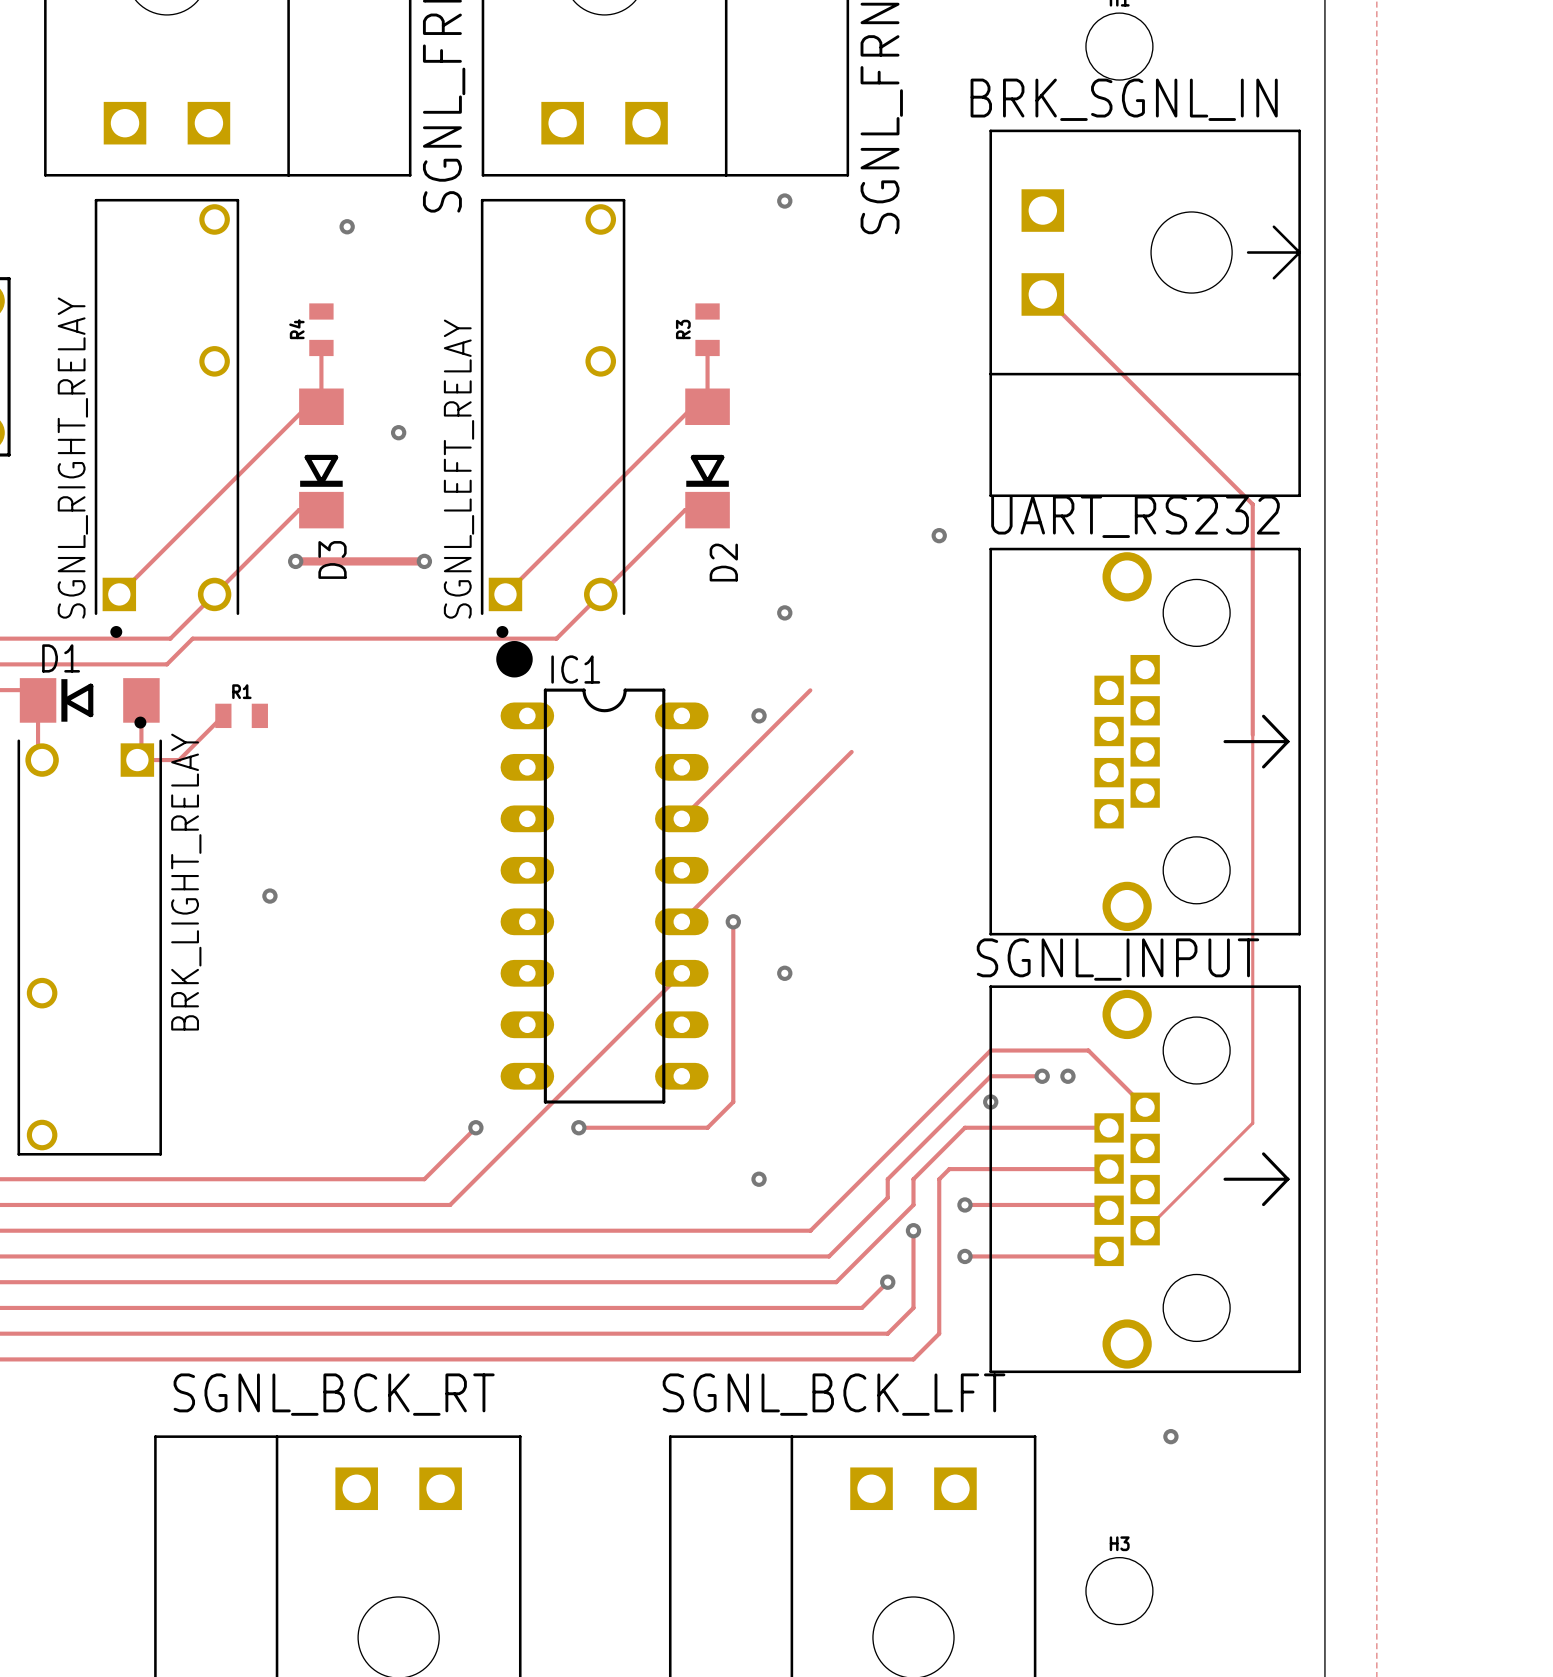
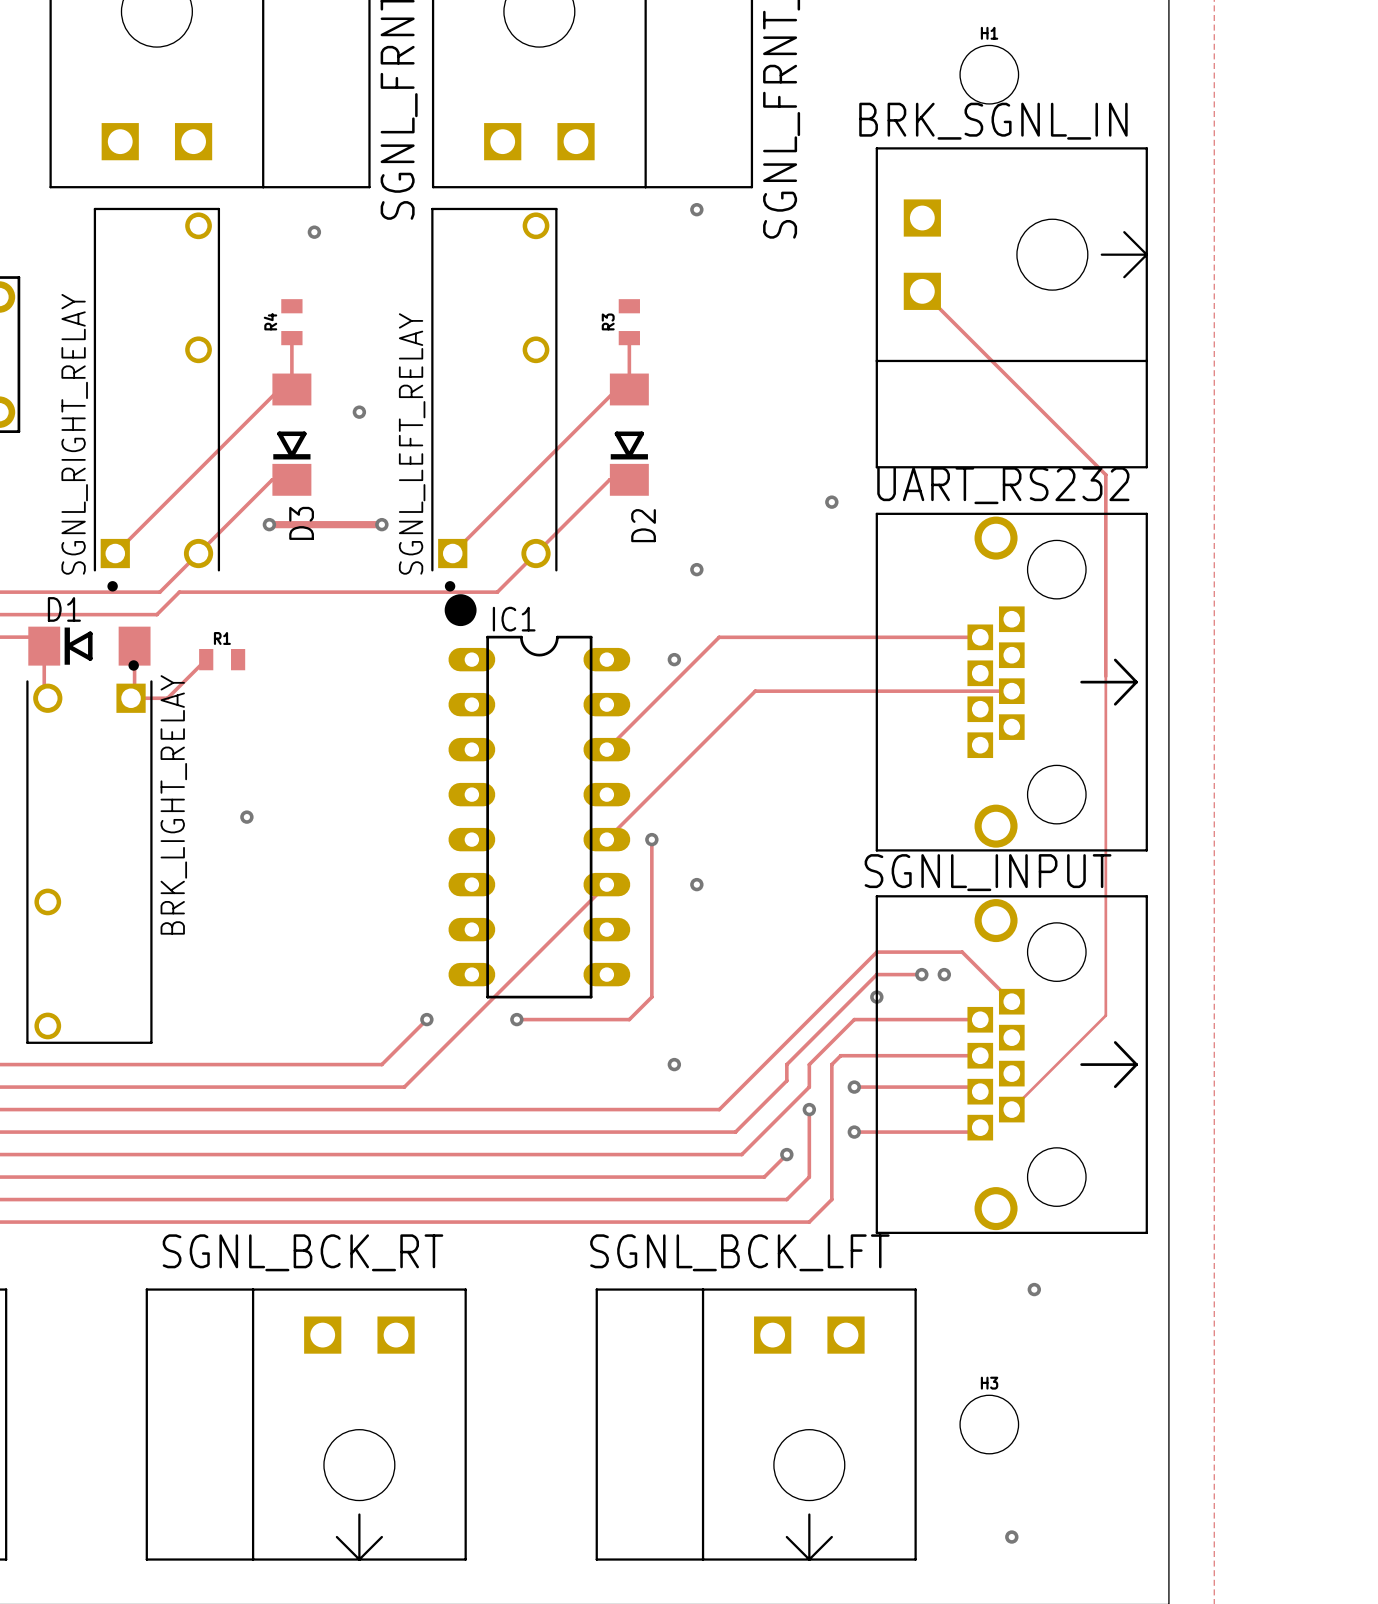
track: none -> (719, 637) (980, 637)
track: none -> (755, 691) (1011, 691)

